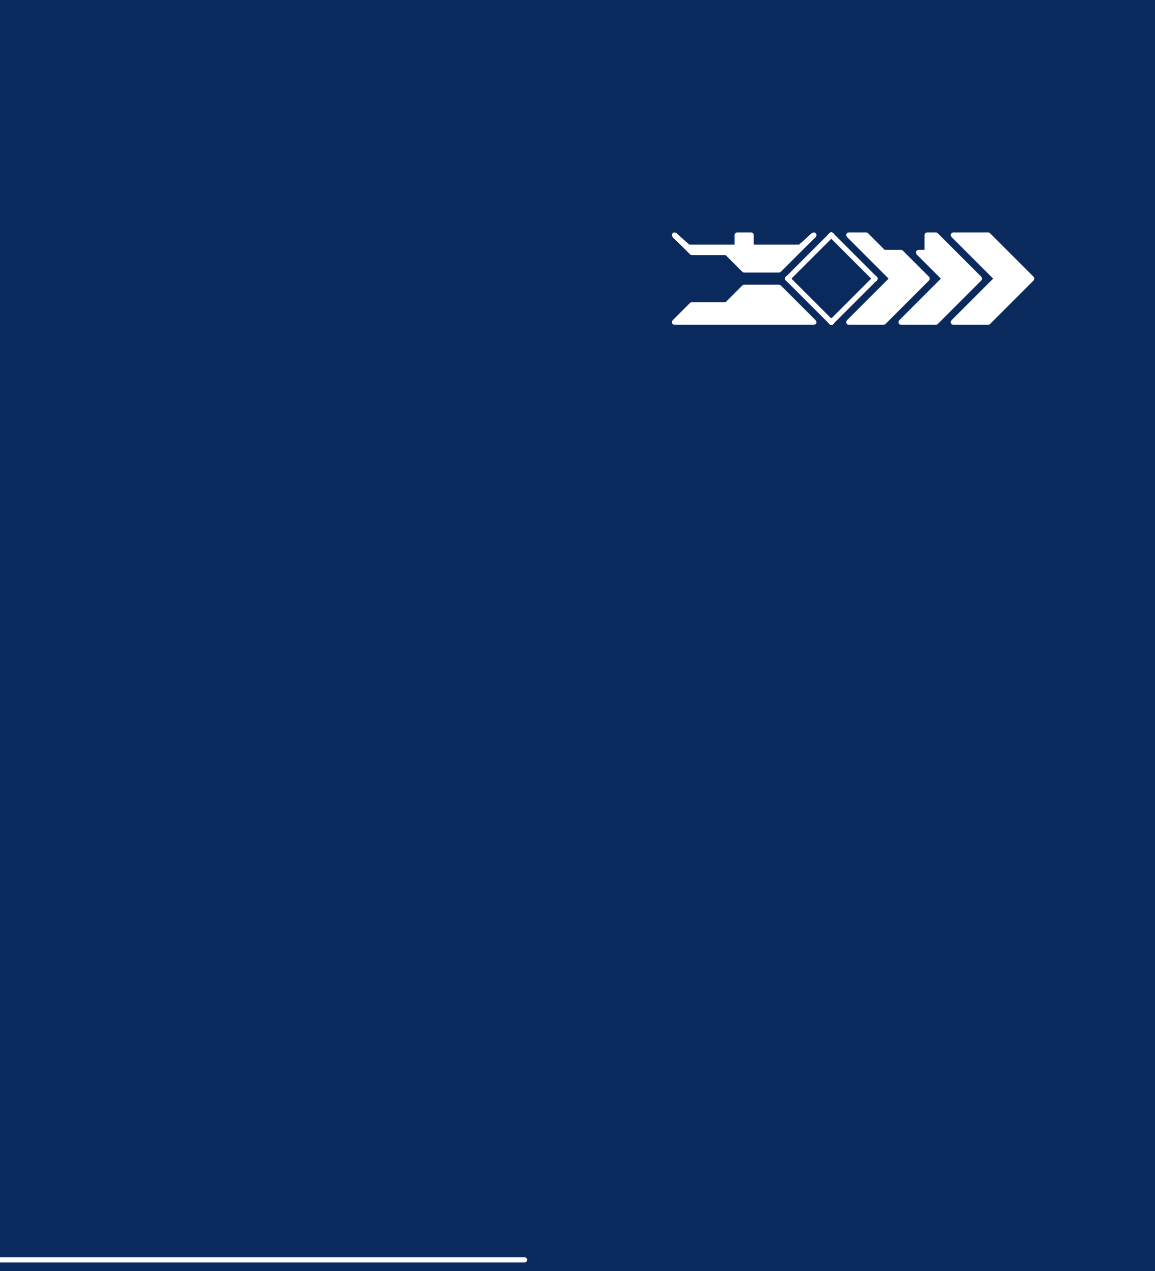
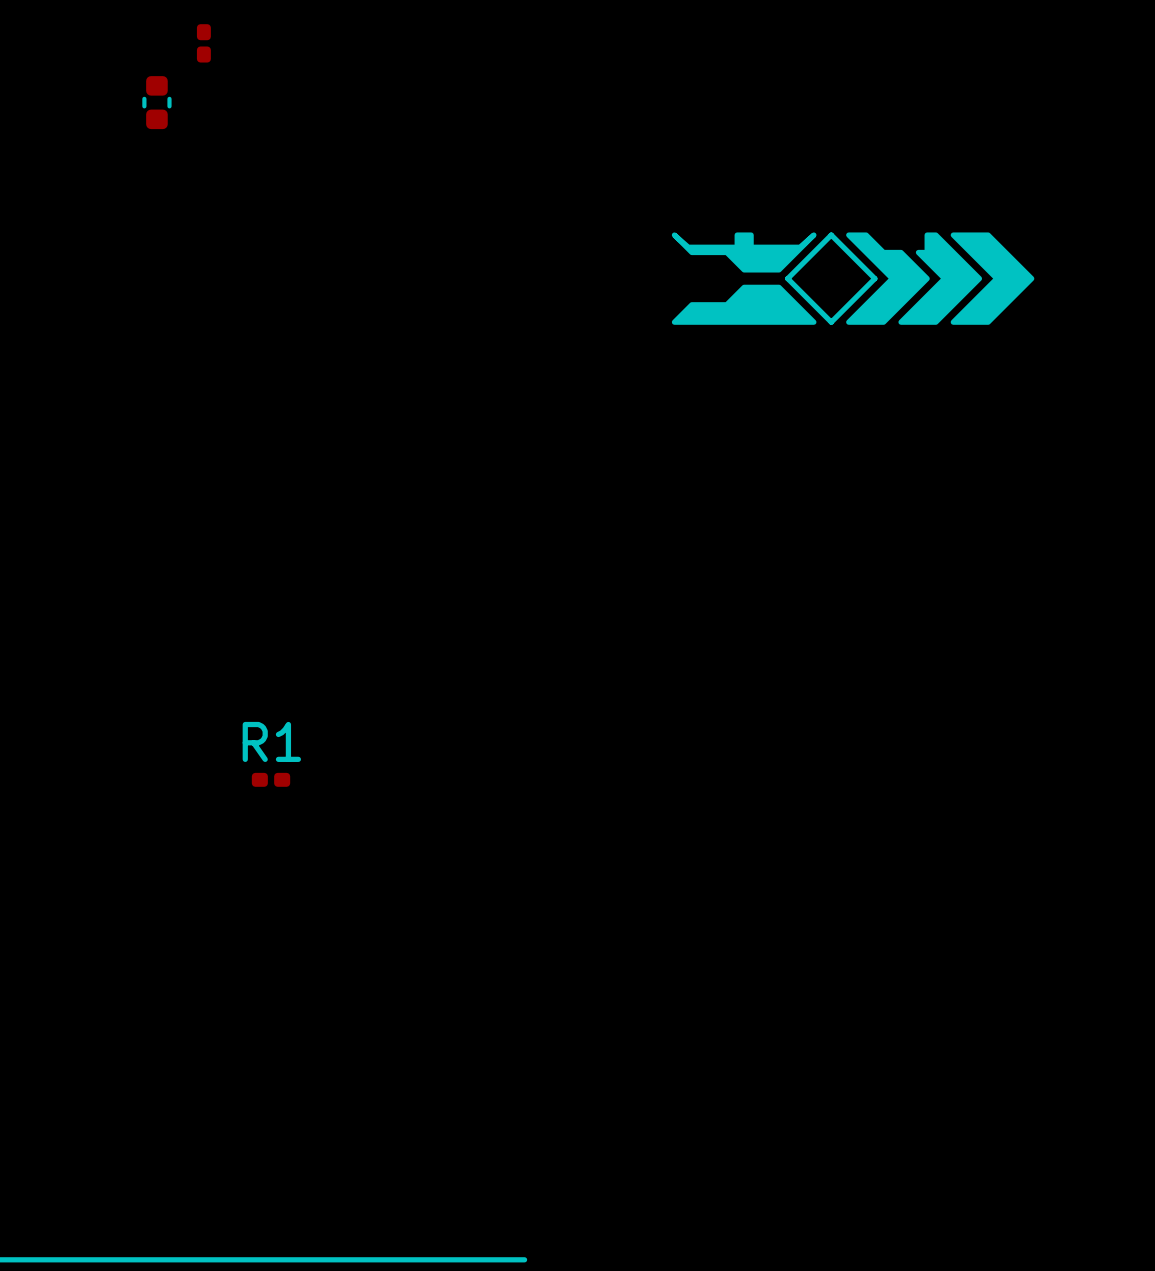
part: none -> (203, 43)
part: none -> (156, 102)
R1: none -> (271, 779)

